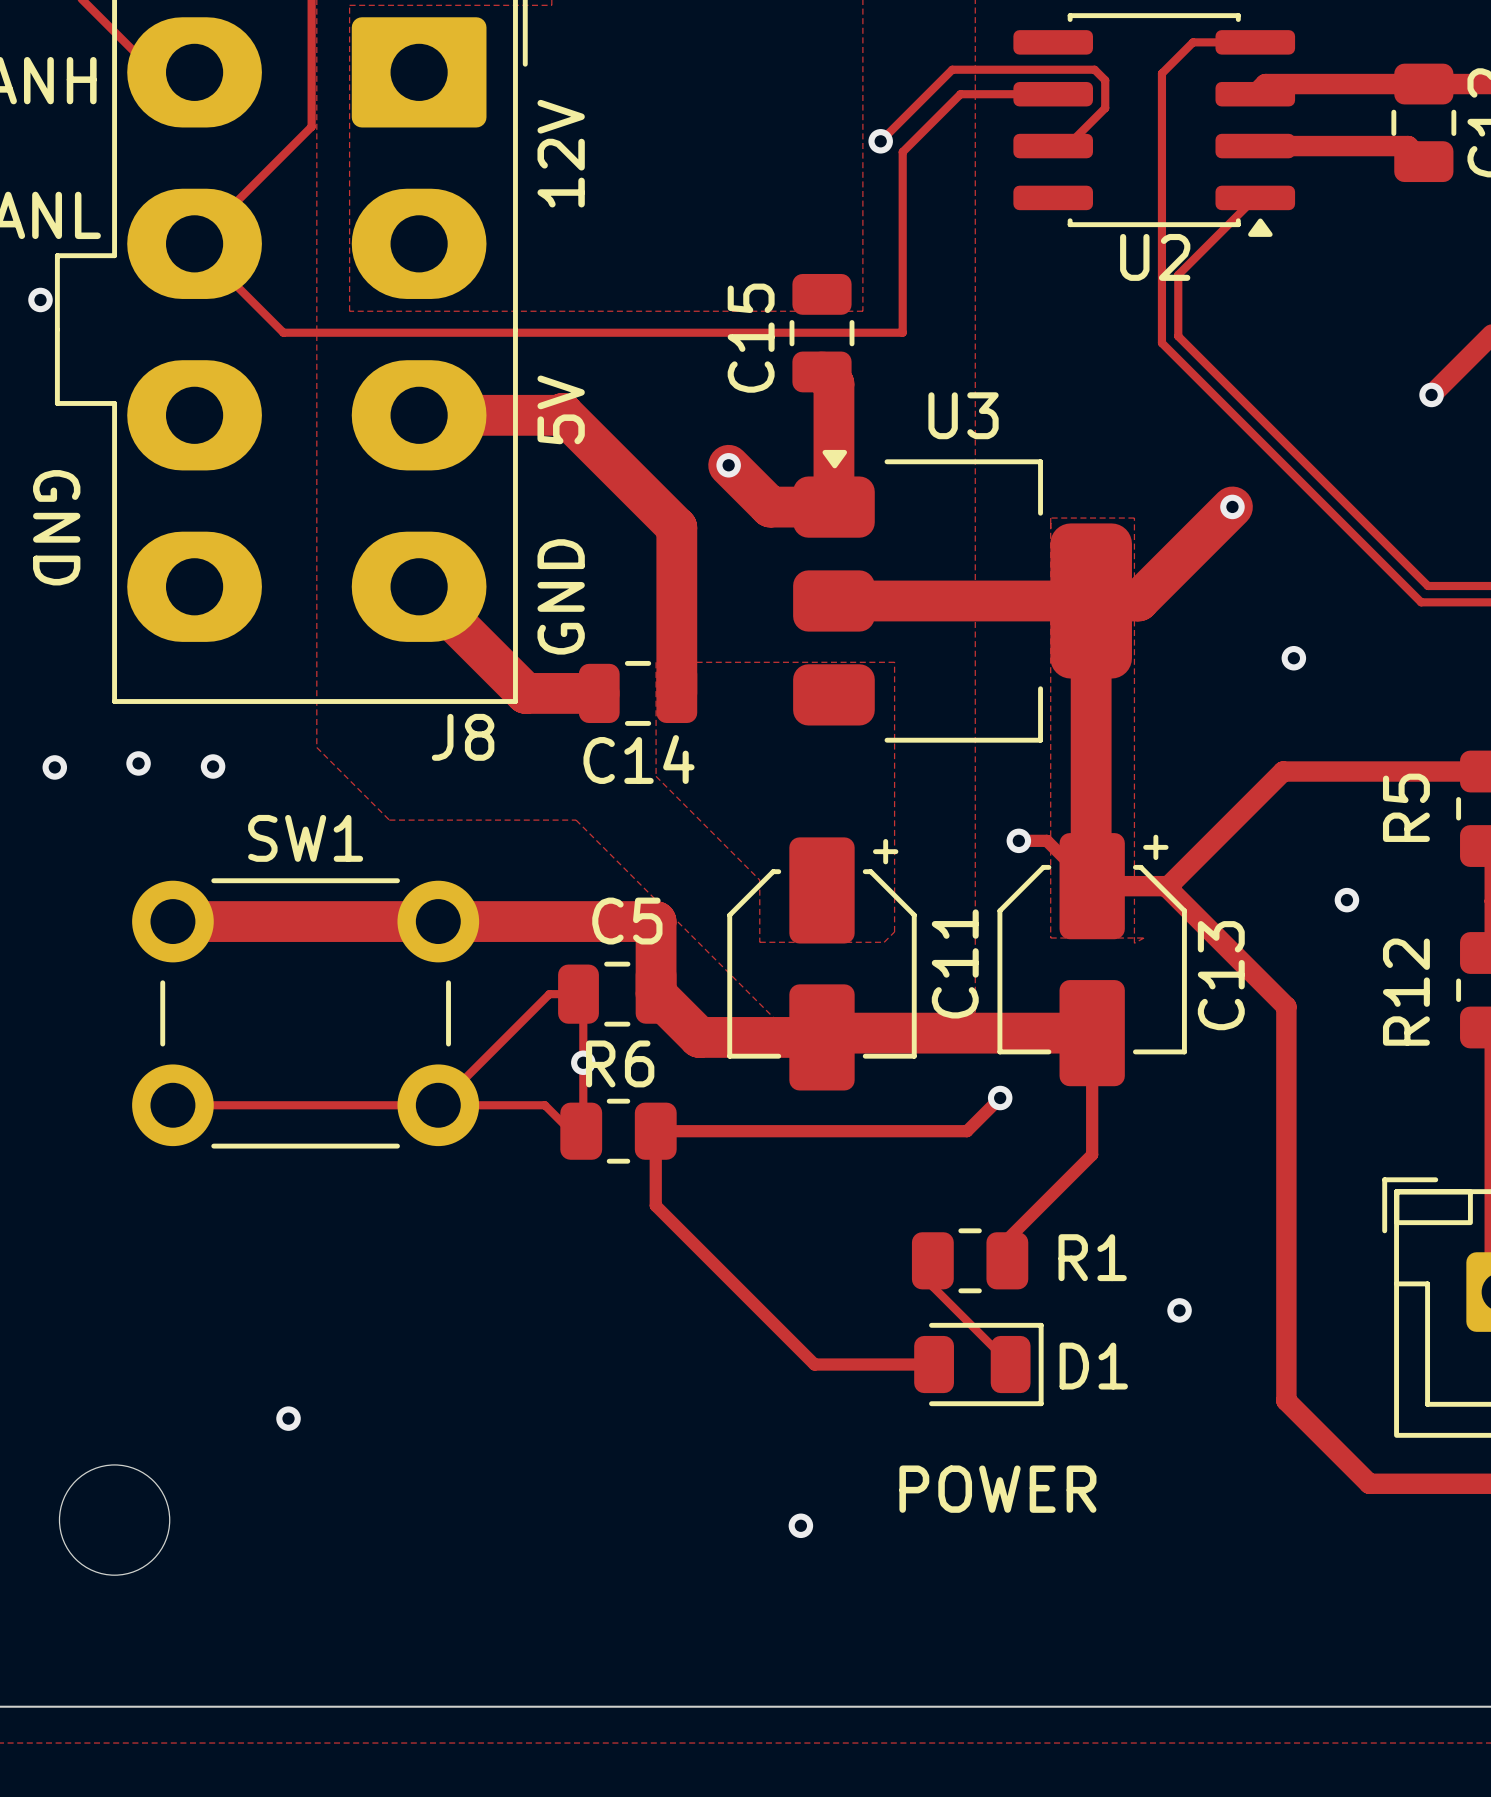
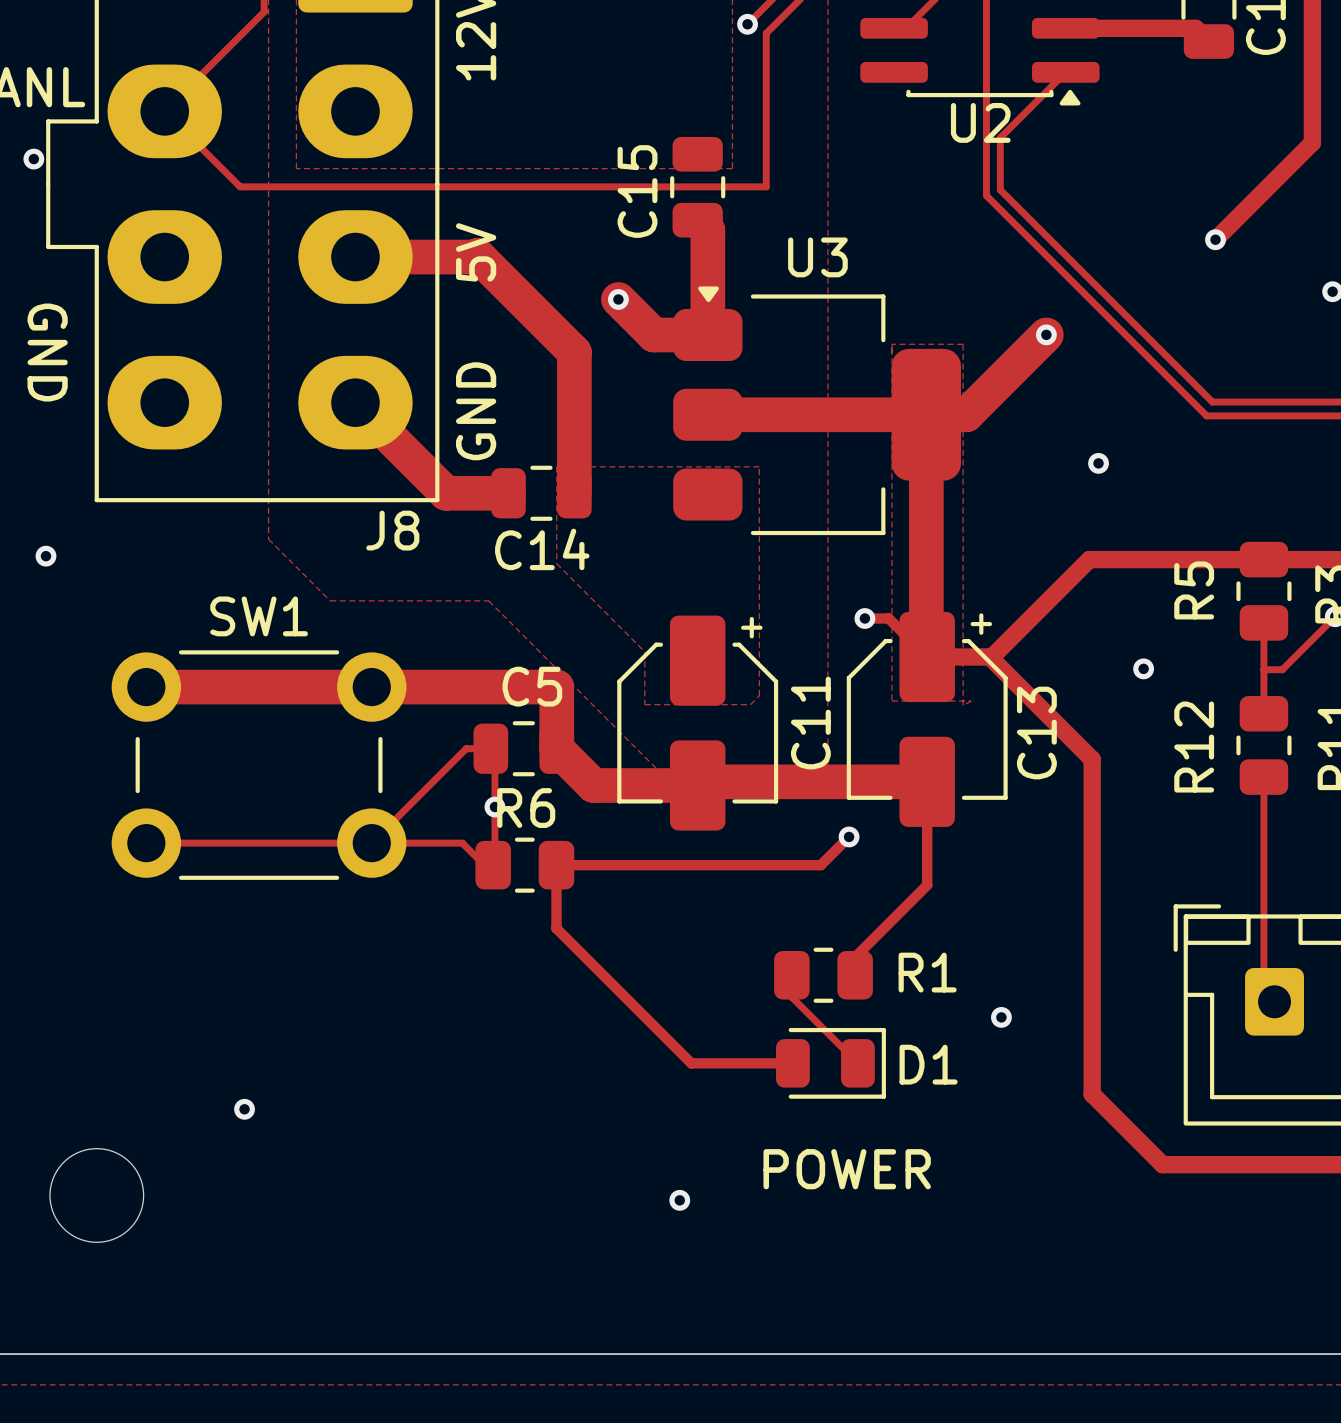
via: (138, 763) -> none
via: (213, 766) -> none

